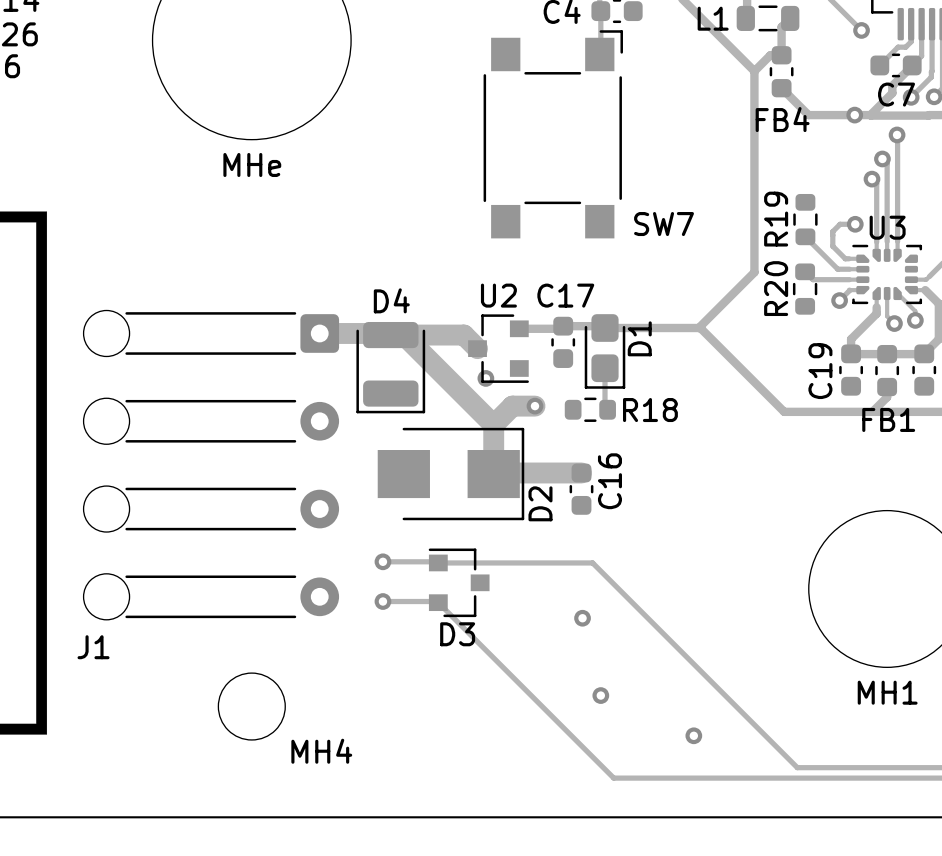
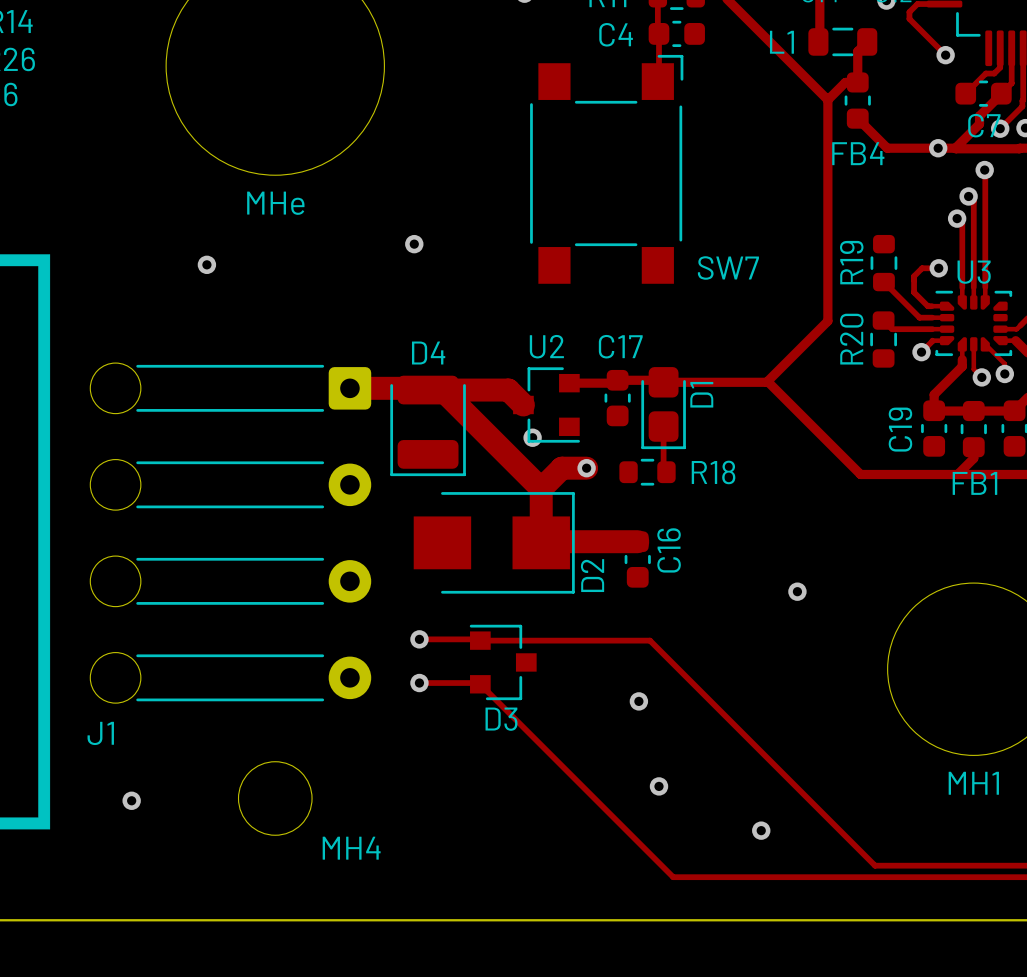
via: none -> (414, 244)
via: none -> (206, 264)
via: none -> (797, 591)
via: none -> (131, 800)

